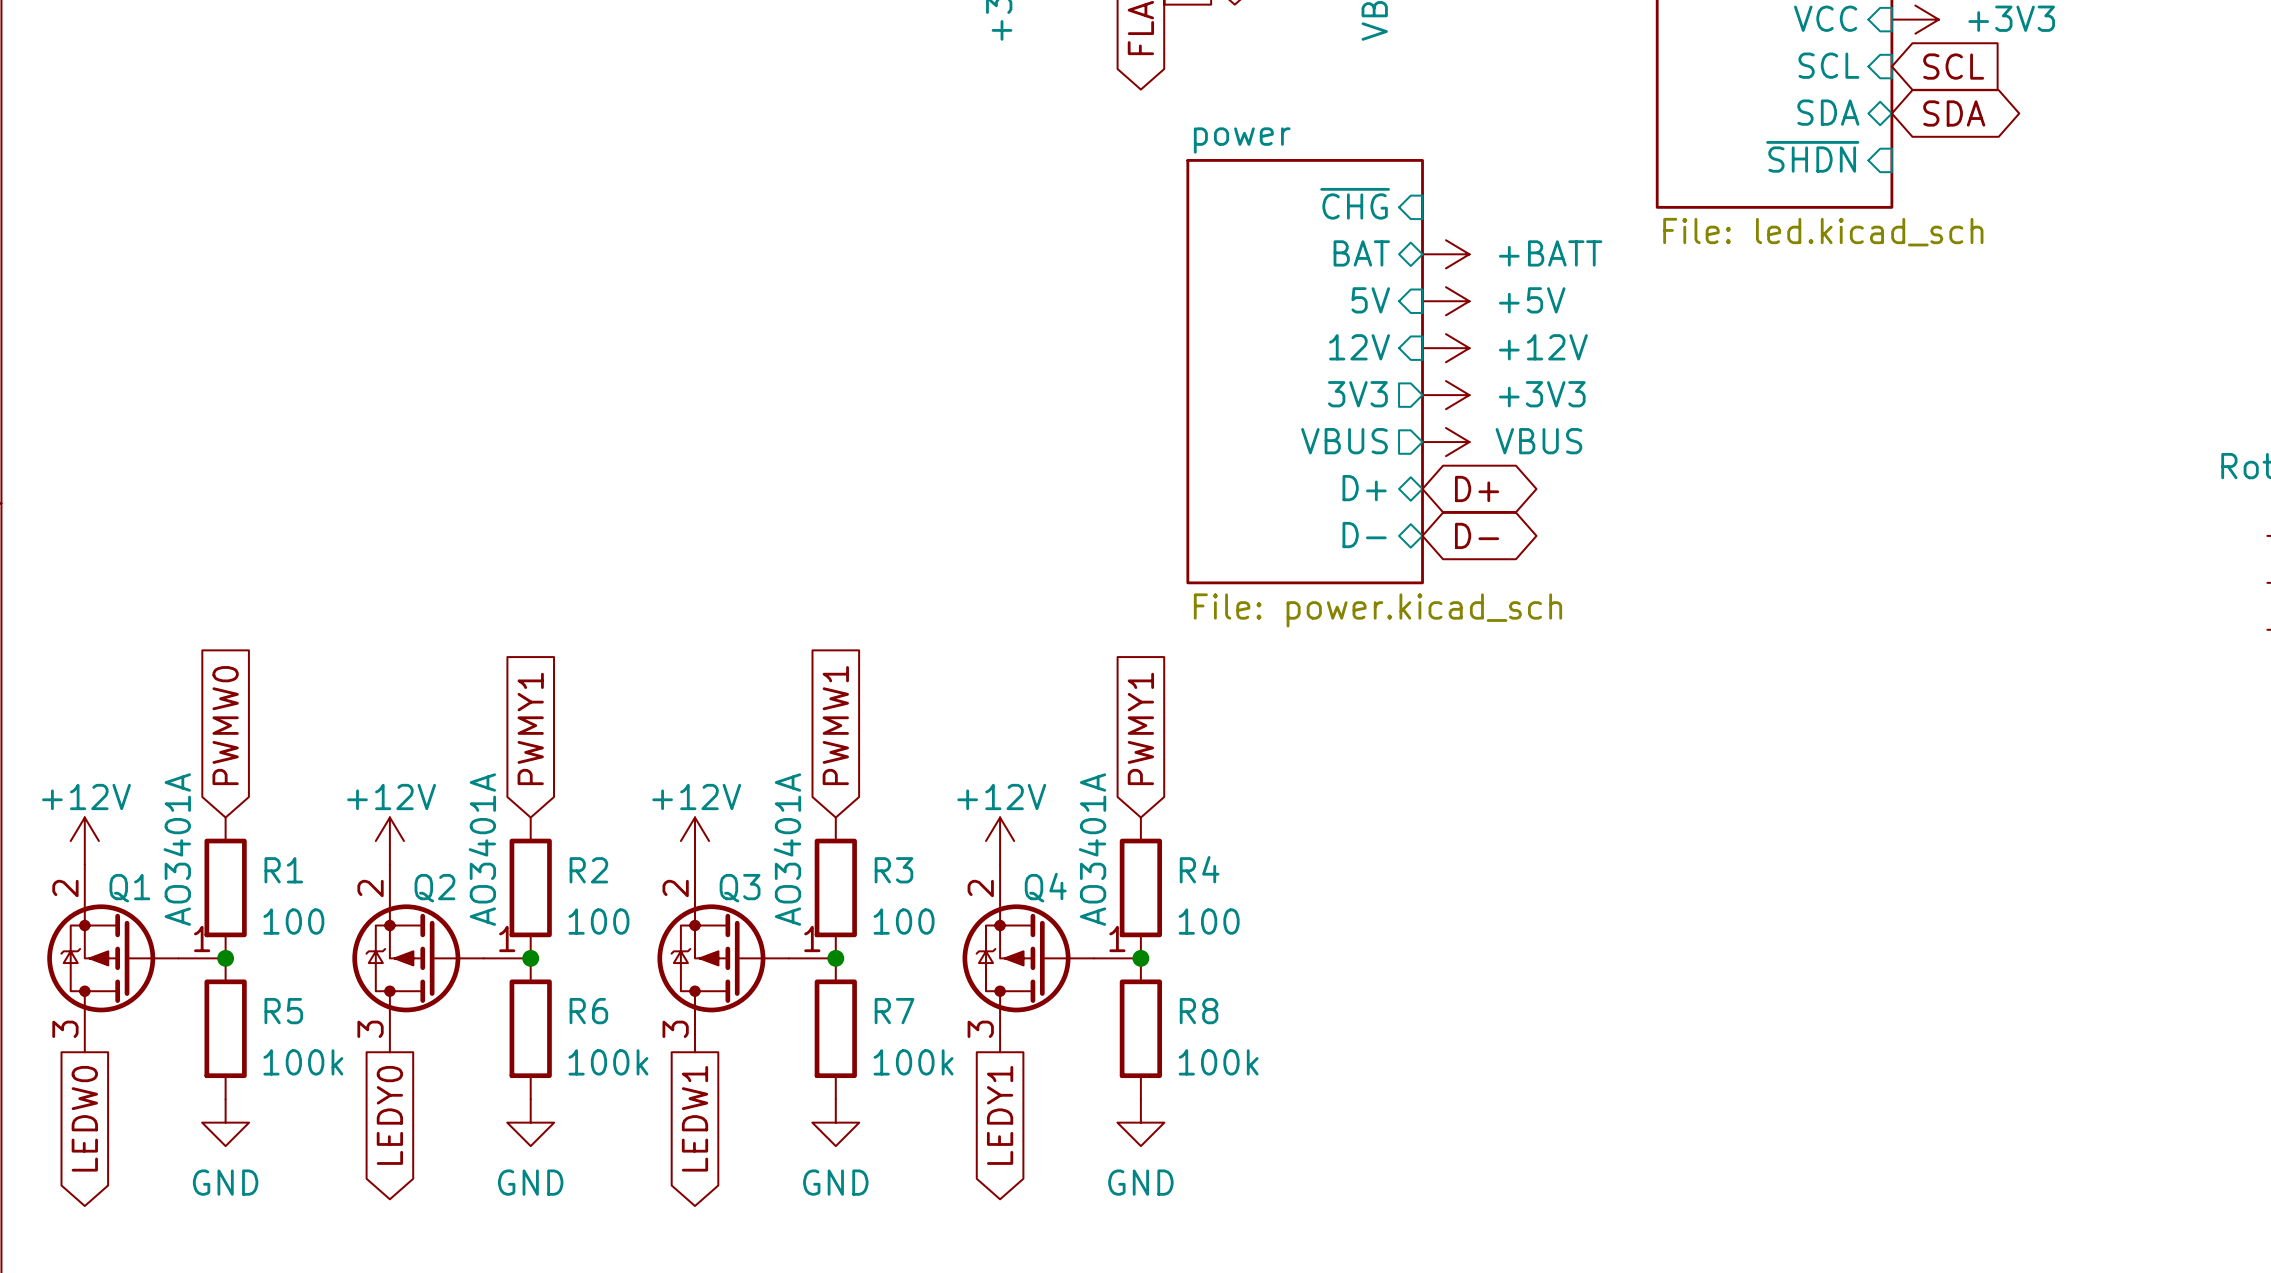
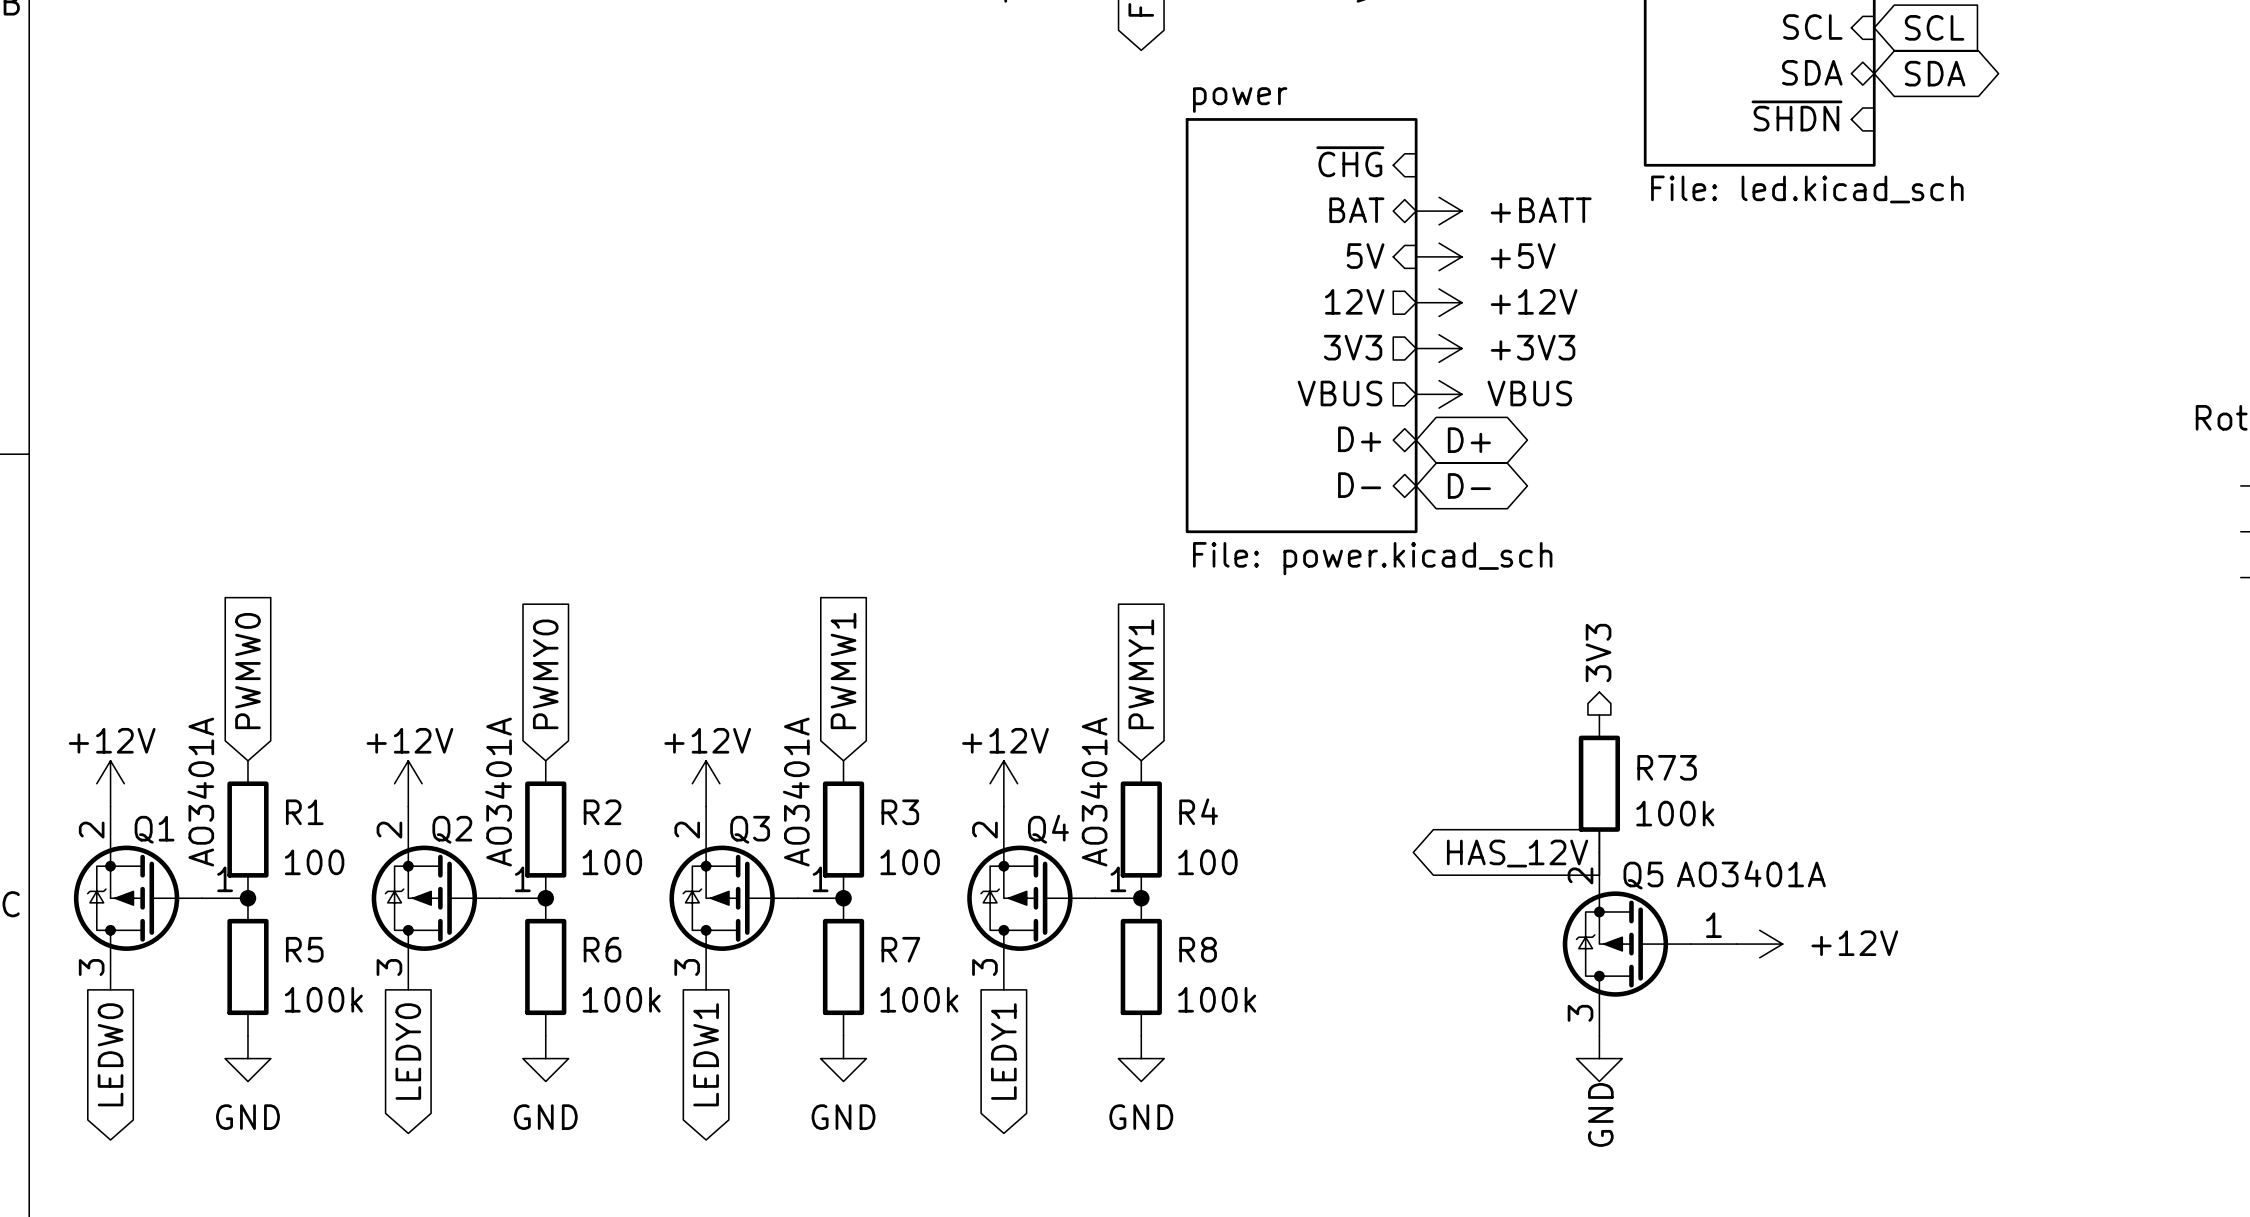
sheet pin shape: input (1359, 347) -> output (1354, 301)
hierarchical label: none -> 3V3 (1598, 653)
global label: PWMY1 (530, 728) -> PWMY0 (545, 674)
R73: none -> 100k (1599, 783)
global label: none -> HAS_12V (1517, 853)
Q5: none -> AO3401A (1649, 944)
power symbol: none -> +12V (1759, 944)
power symbol: none -> GND (1599, 1058)

